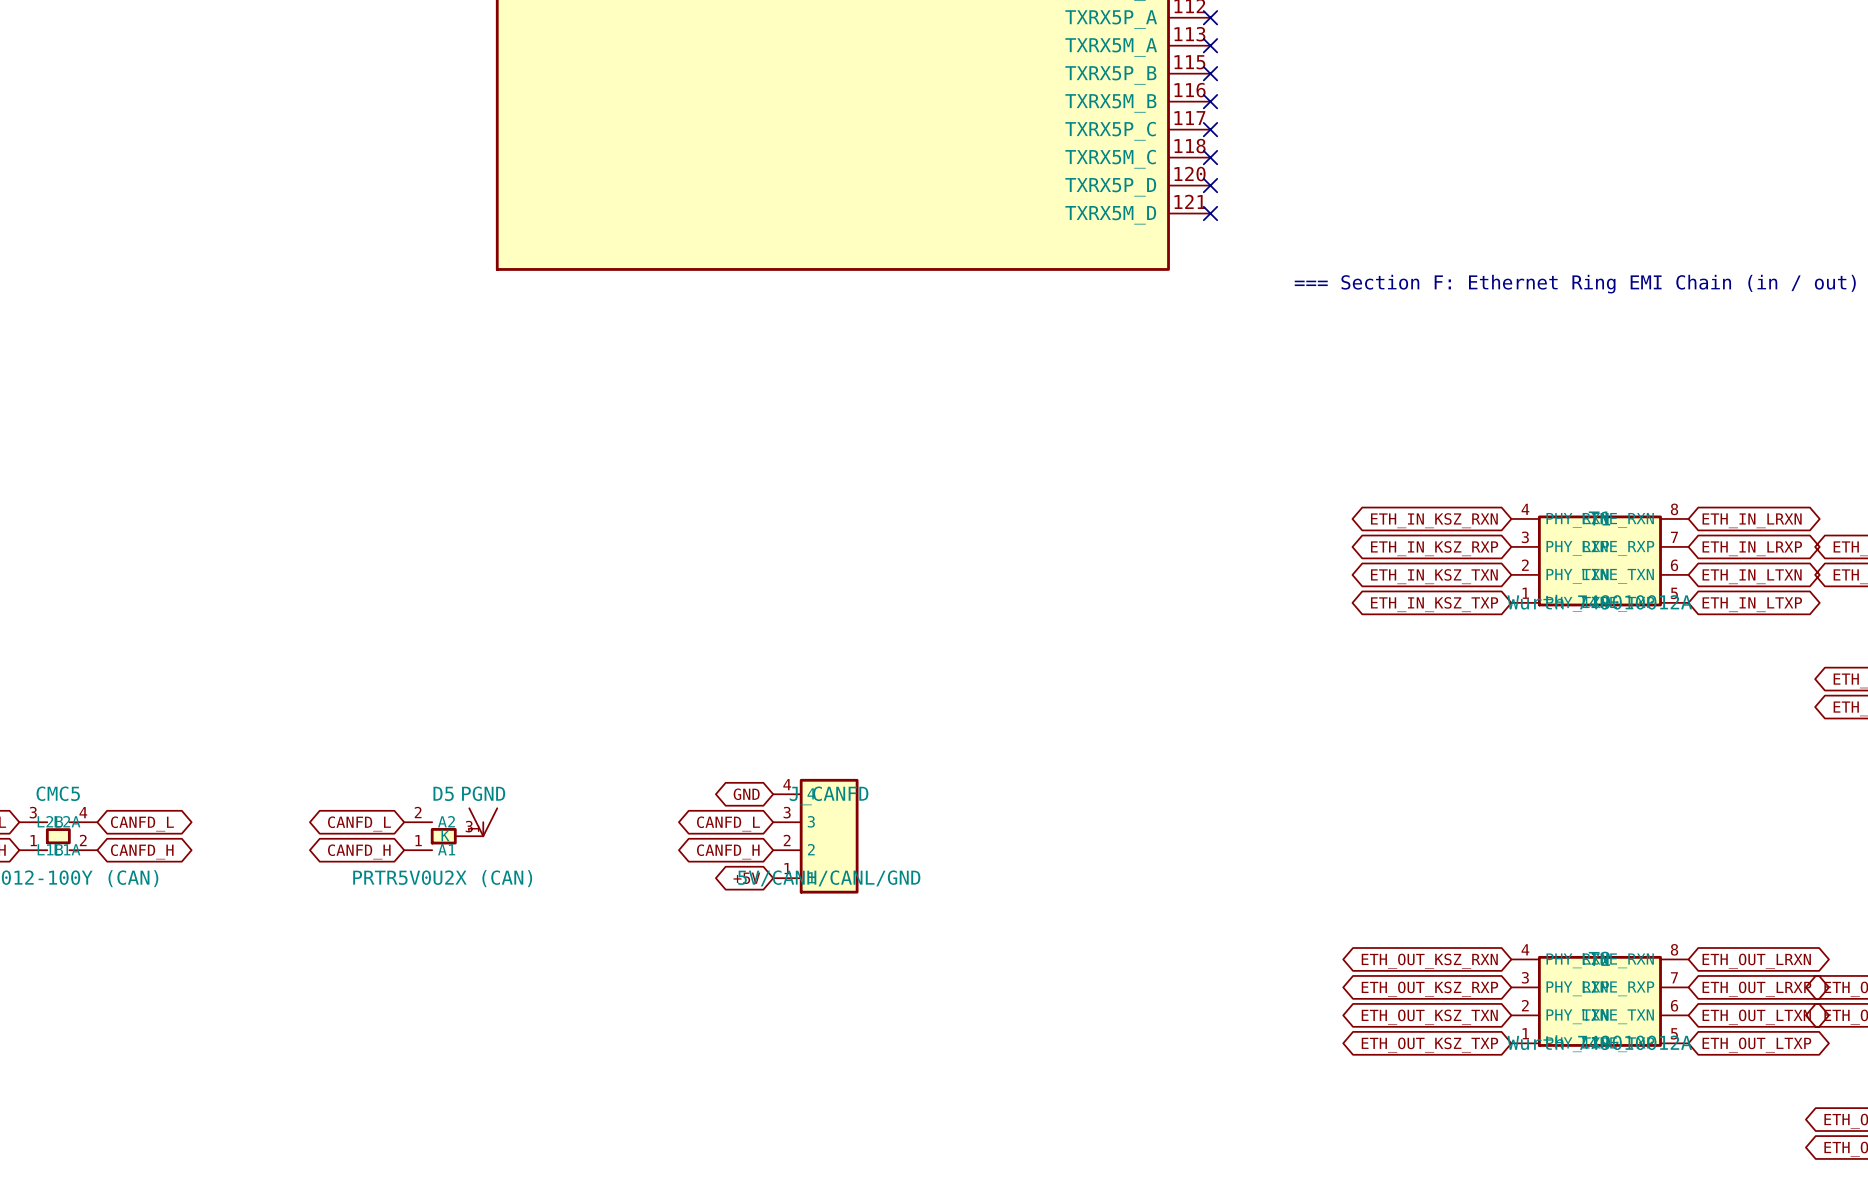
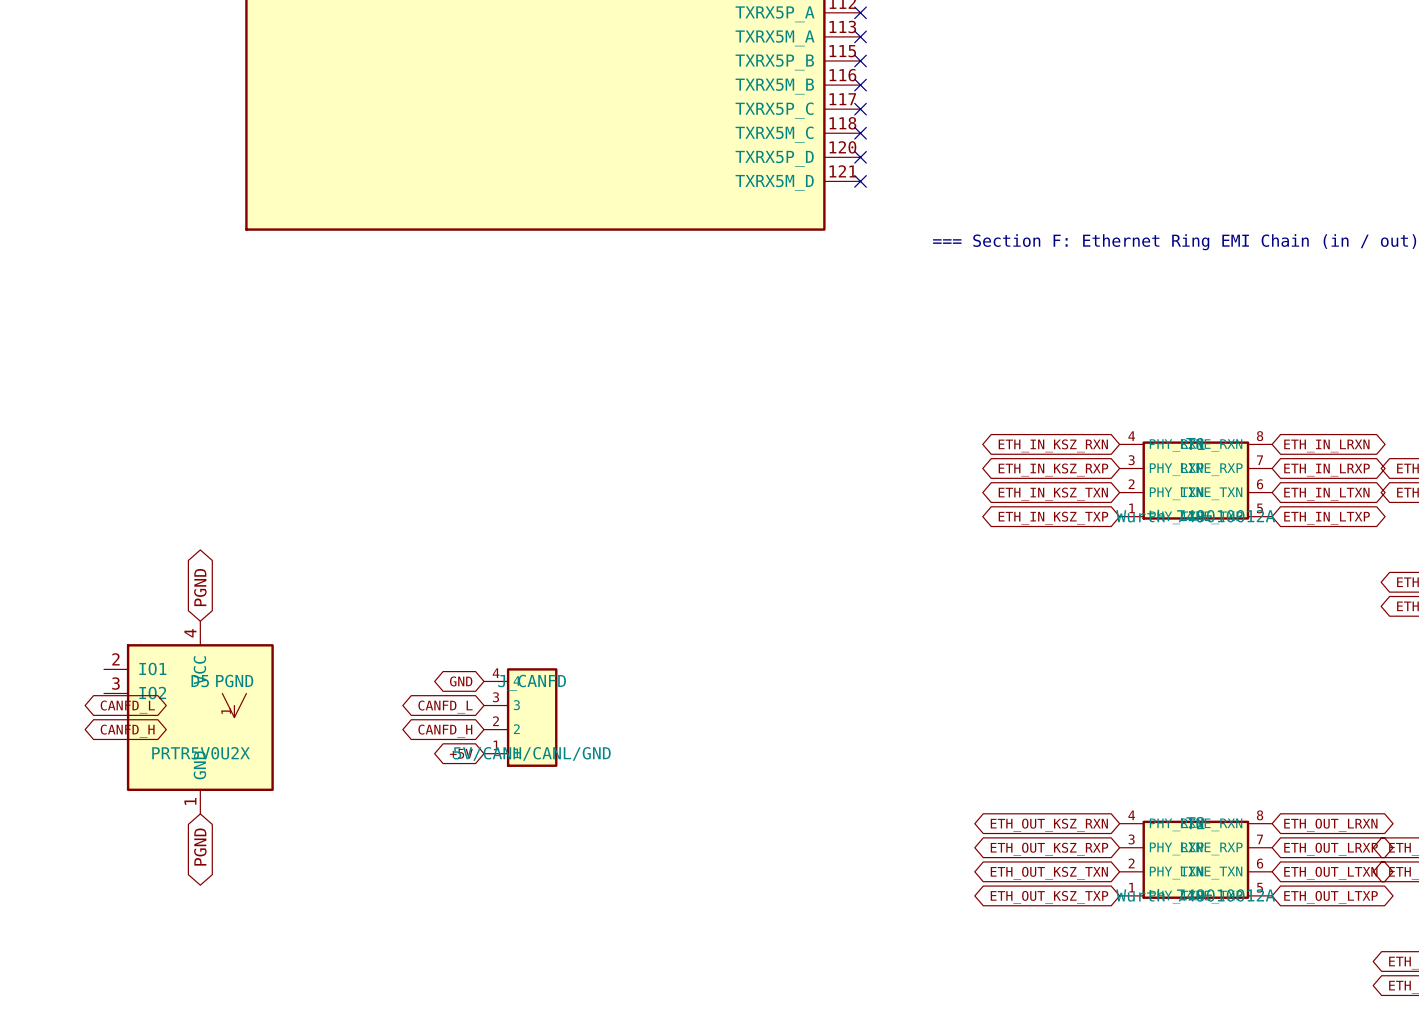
global label: none -> PGND (200, 587)
D5 symbol: [404, 822, 484, 851] -> [104, 621, 274, 814]
D5 value: PRTR5V0U2X (CAN) (442, 878) -> PRTR5V0U2X (201, 753)
global label: none -> PGND (200, 847)

